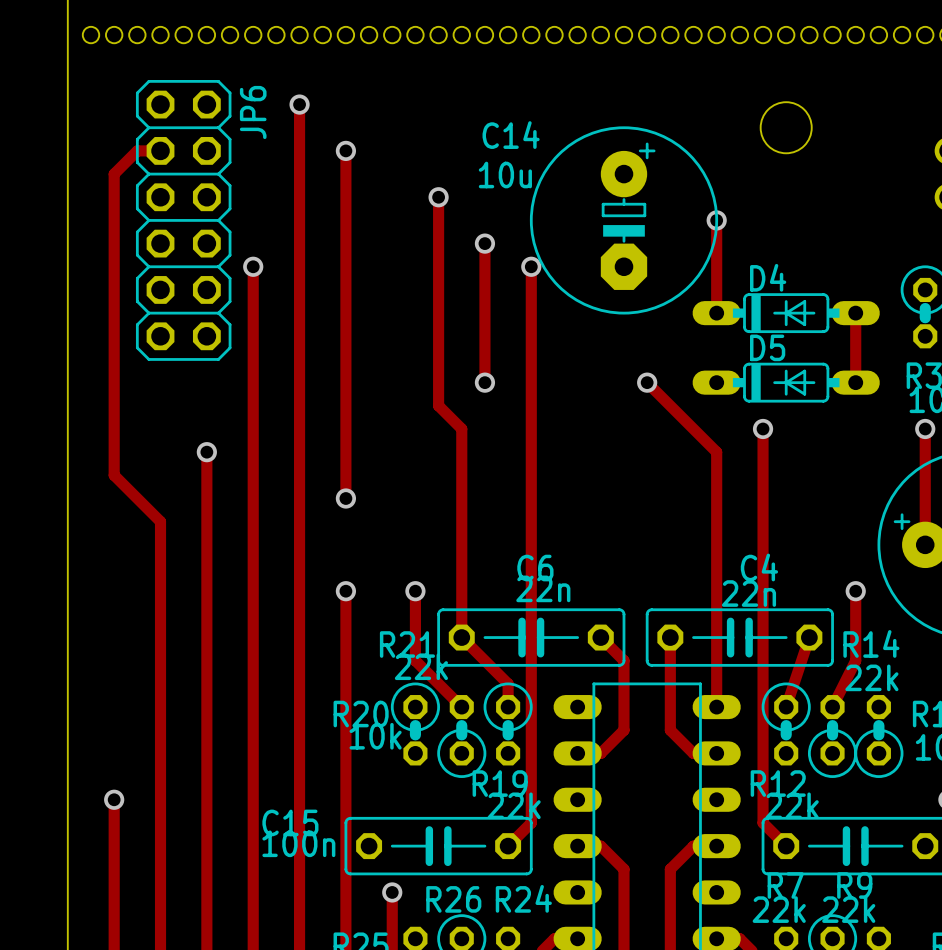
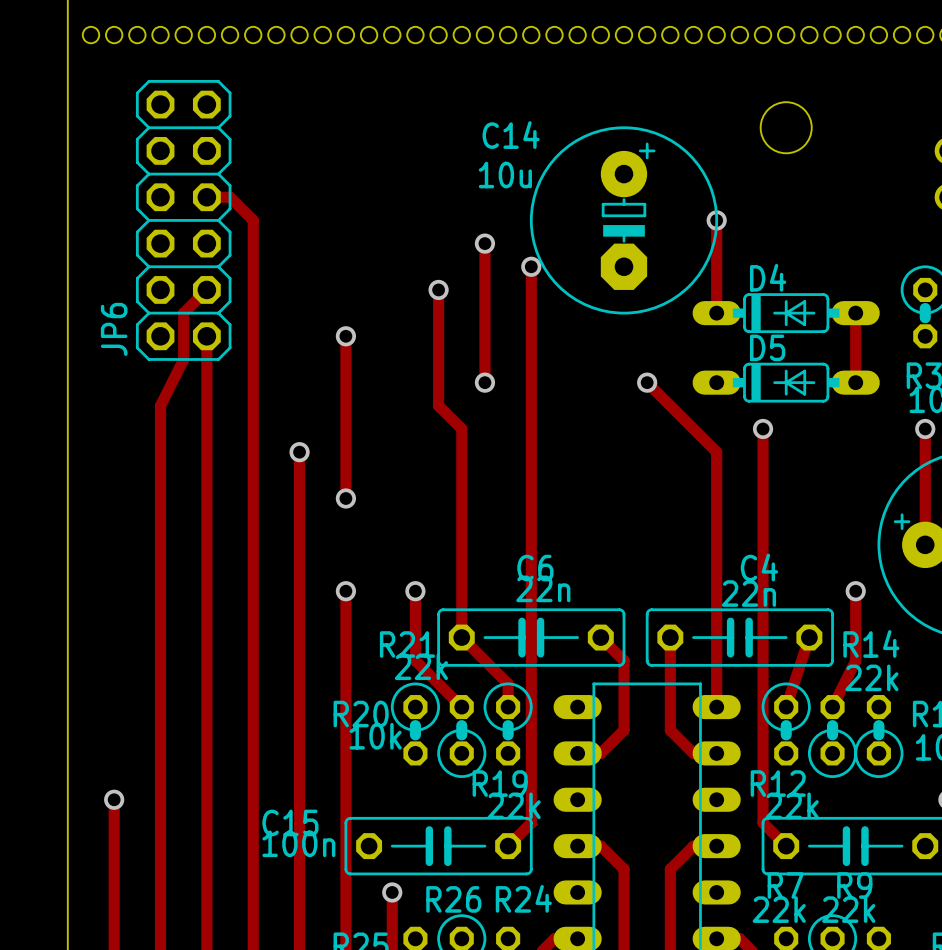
track: (299, 104) (299, 452) -> none
via: (299, 104) -> none
JP6 name position: JP6 (253, 112) -> JP6 (114, 329)
track: (160, 150) (137, 150) (114, 174) (114, 475) (160, 521) -> (206, 289) (183, 313) (183, 359) (160, 405) (160, 521)
track: (345, 150) (345, 336) -> none
via: (345, 150) -> none
track: none -> (206, 197) (230, 197) (253, 220) (253, 266)
track: (438, 197) (438, 289) -> none
via: (438, 197) -> none
via: (253, 266) -> none
via: none -> (438, 289)
track: none -> (206, 336) (206, 452)
via: none -> (345, 336)
via: (206, 452) -> none
via: none -> (299, 452)

